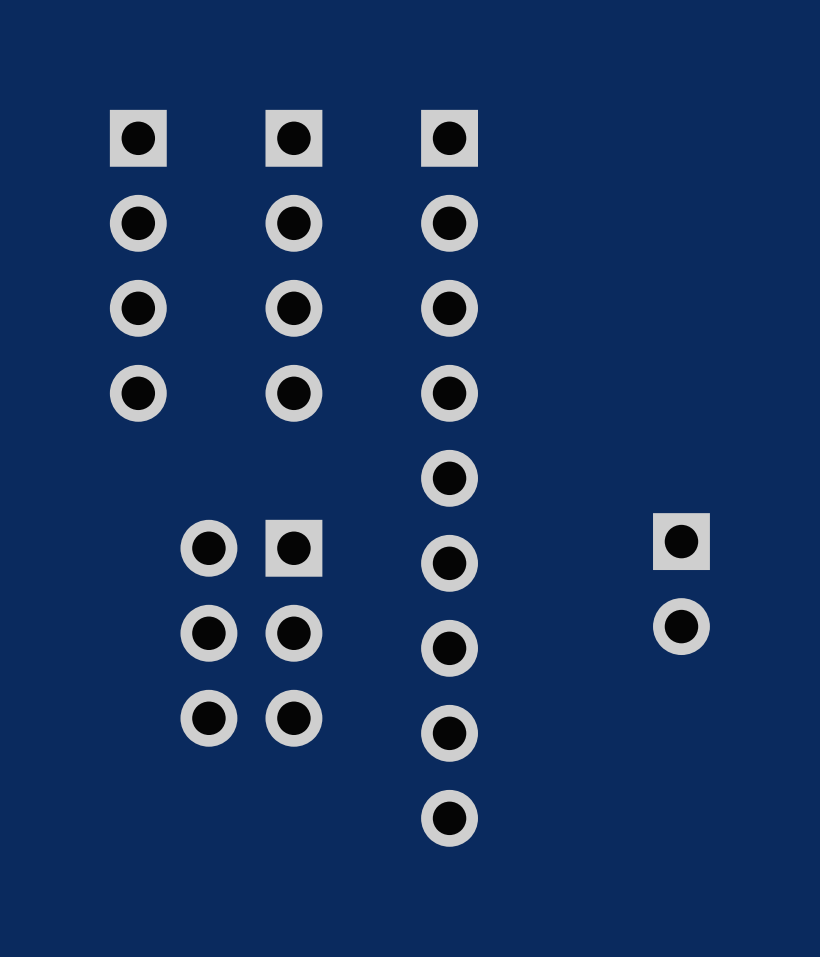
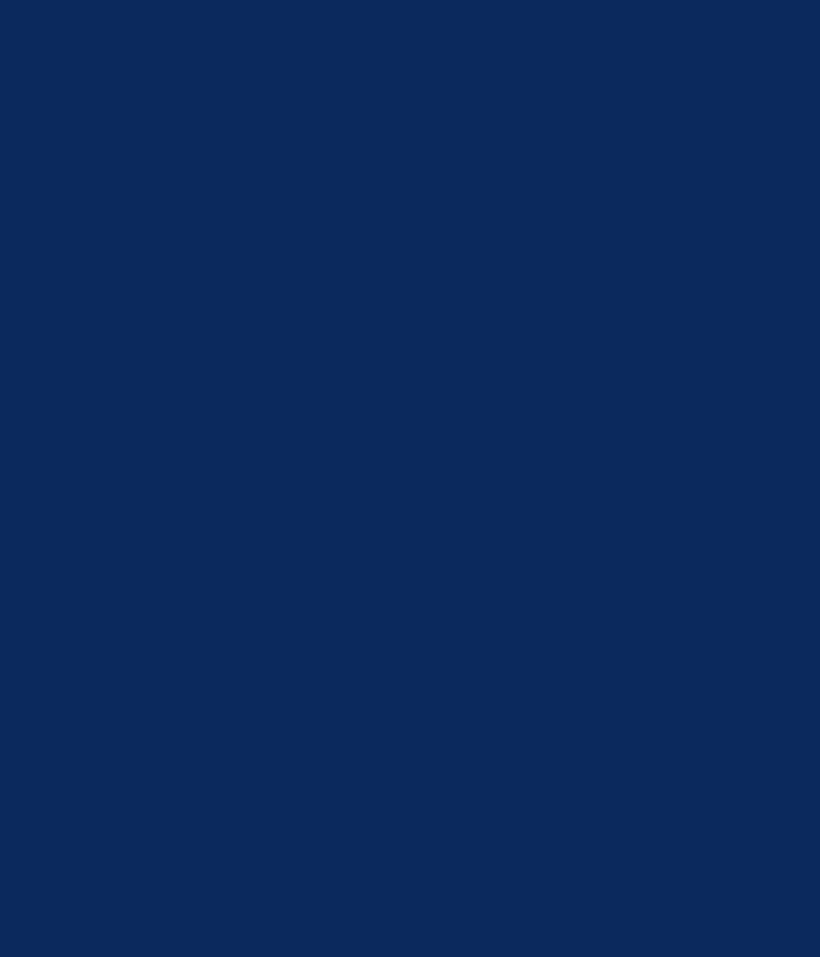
part: (138, 265) -> none
part: (293, 265) -> none
part: (449, 478) -> none
part: (681, 584) -> none
part: (251, 633) -> none

